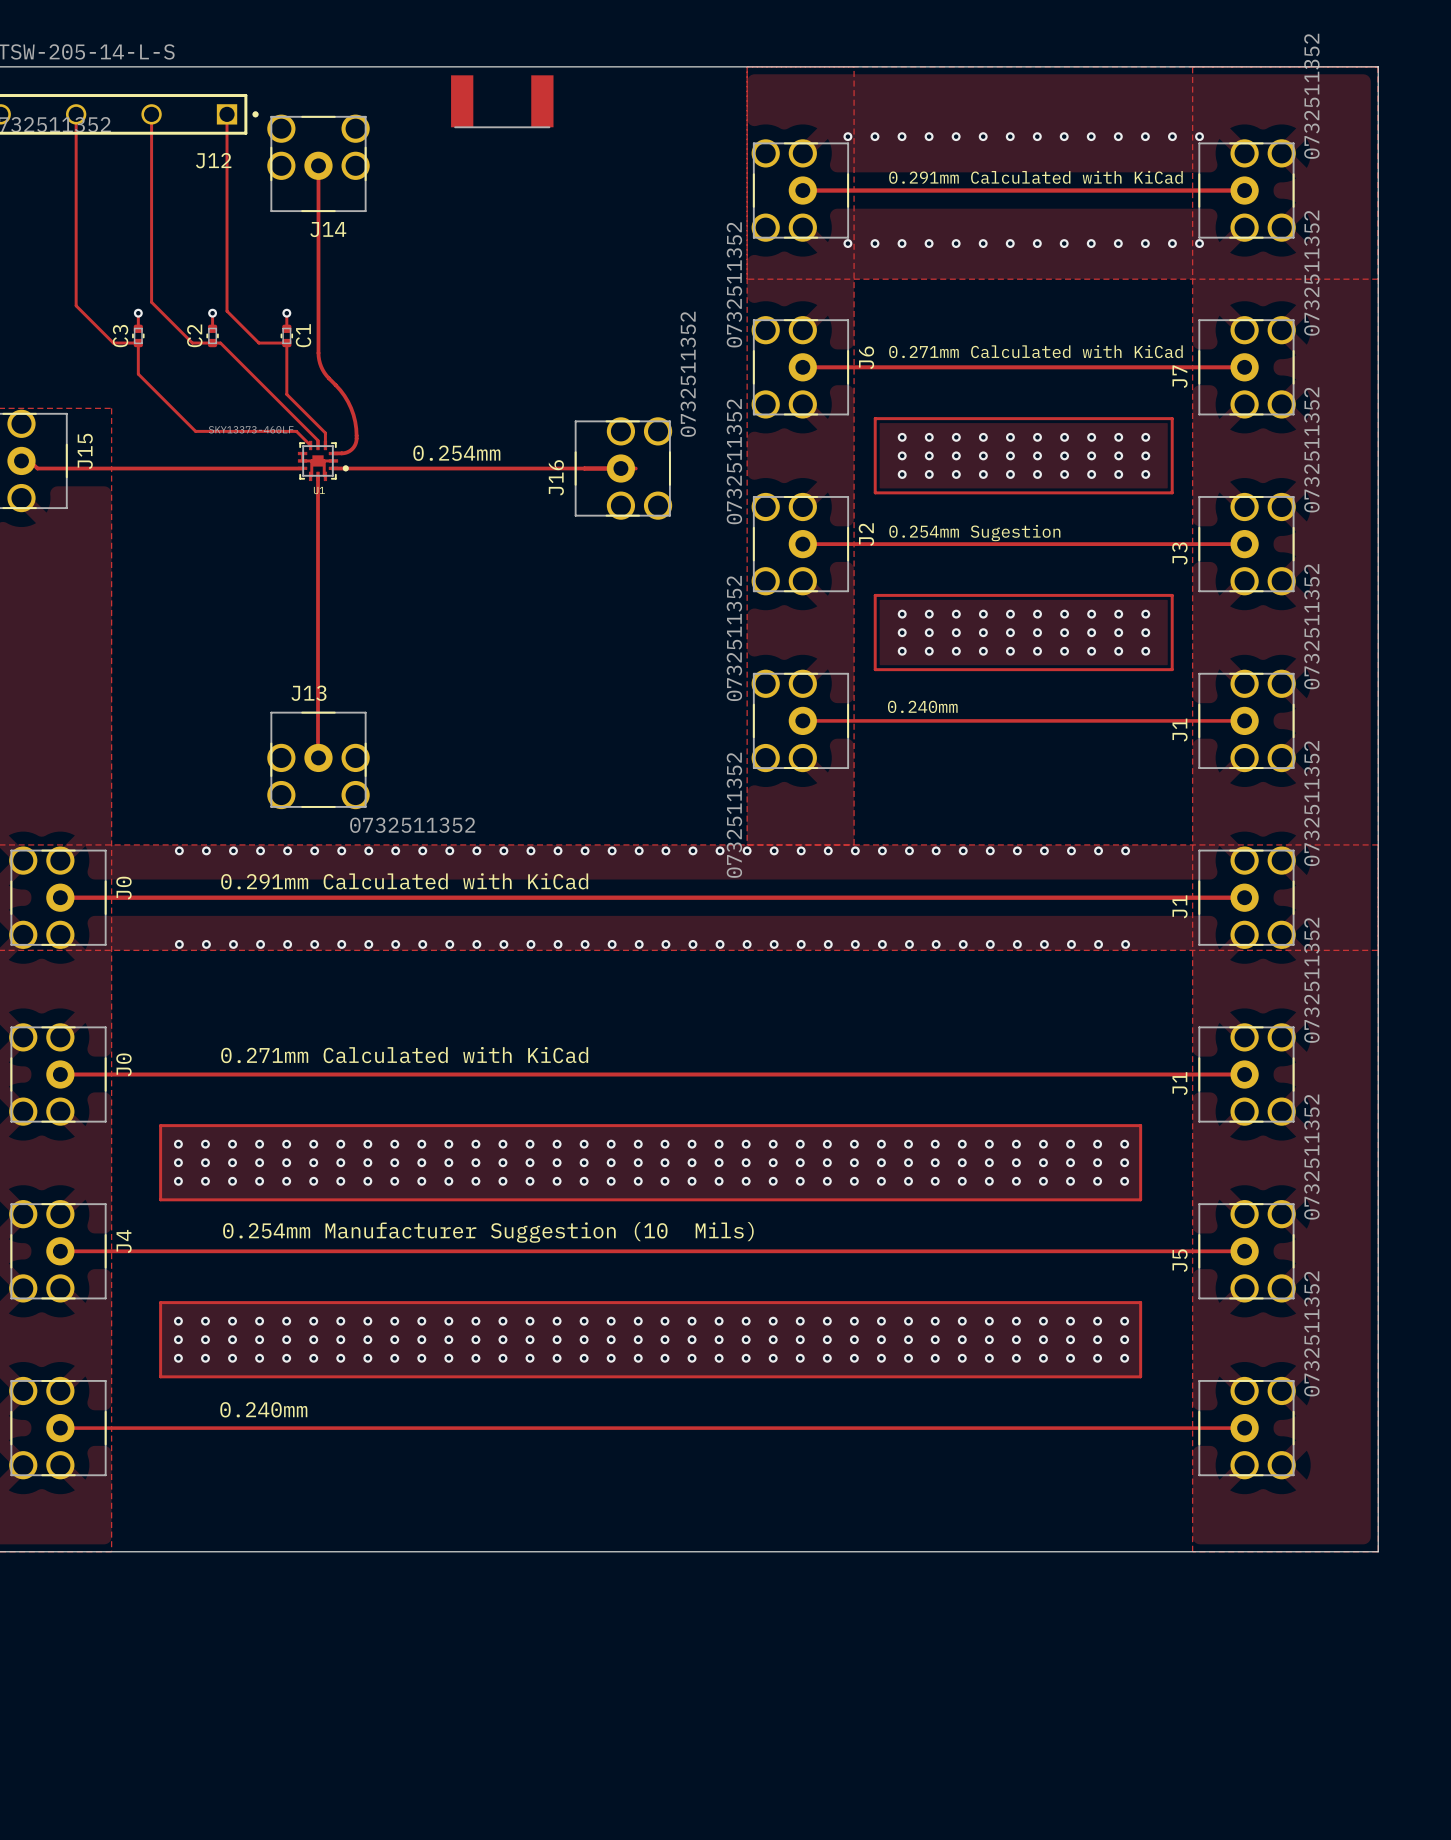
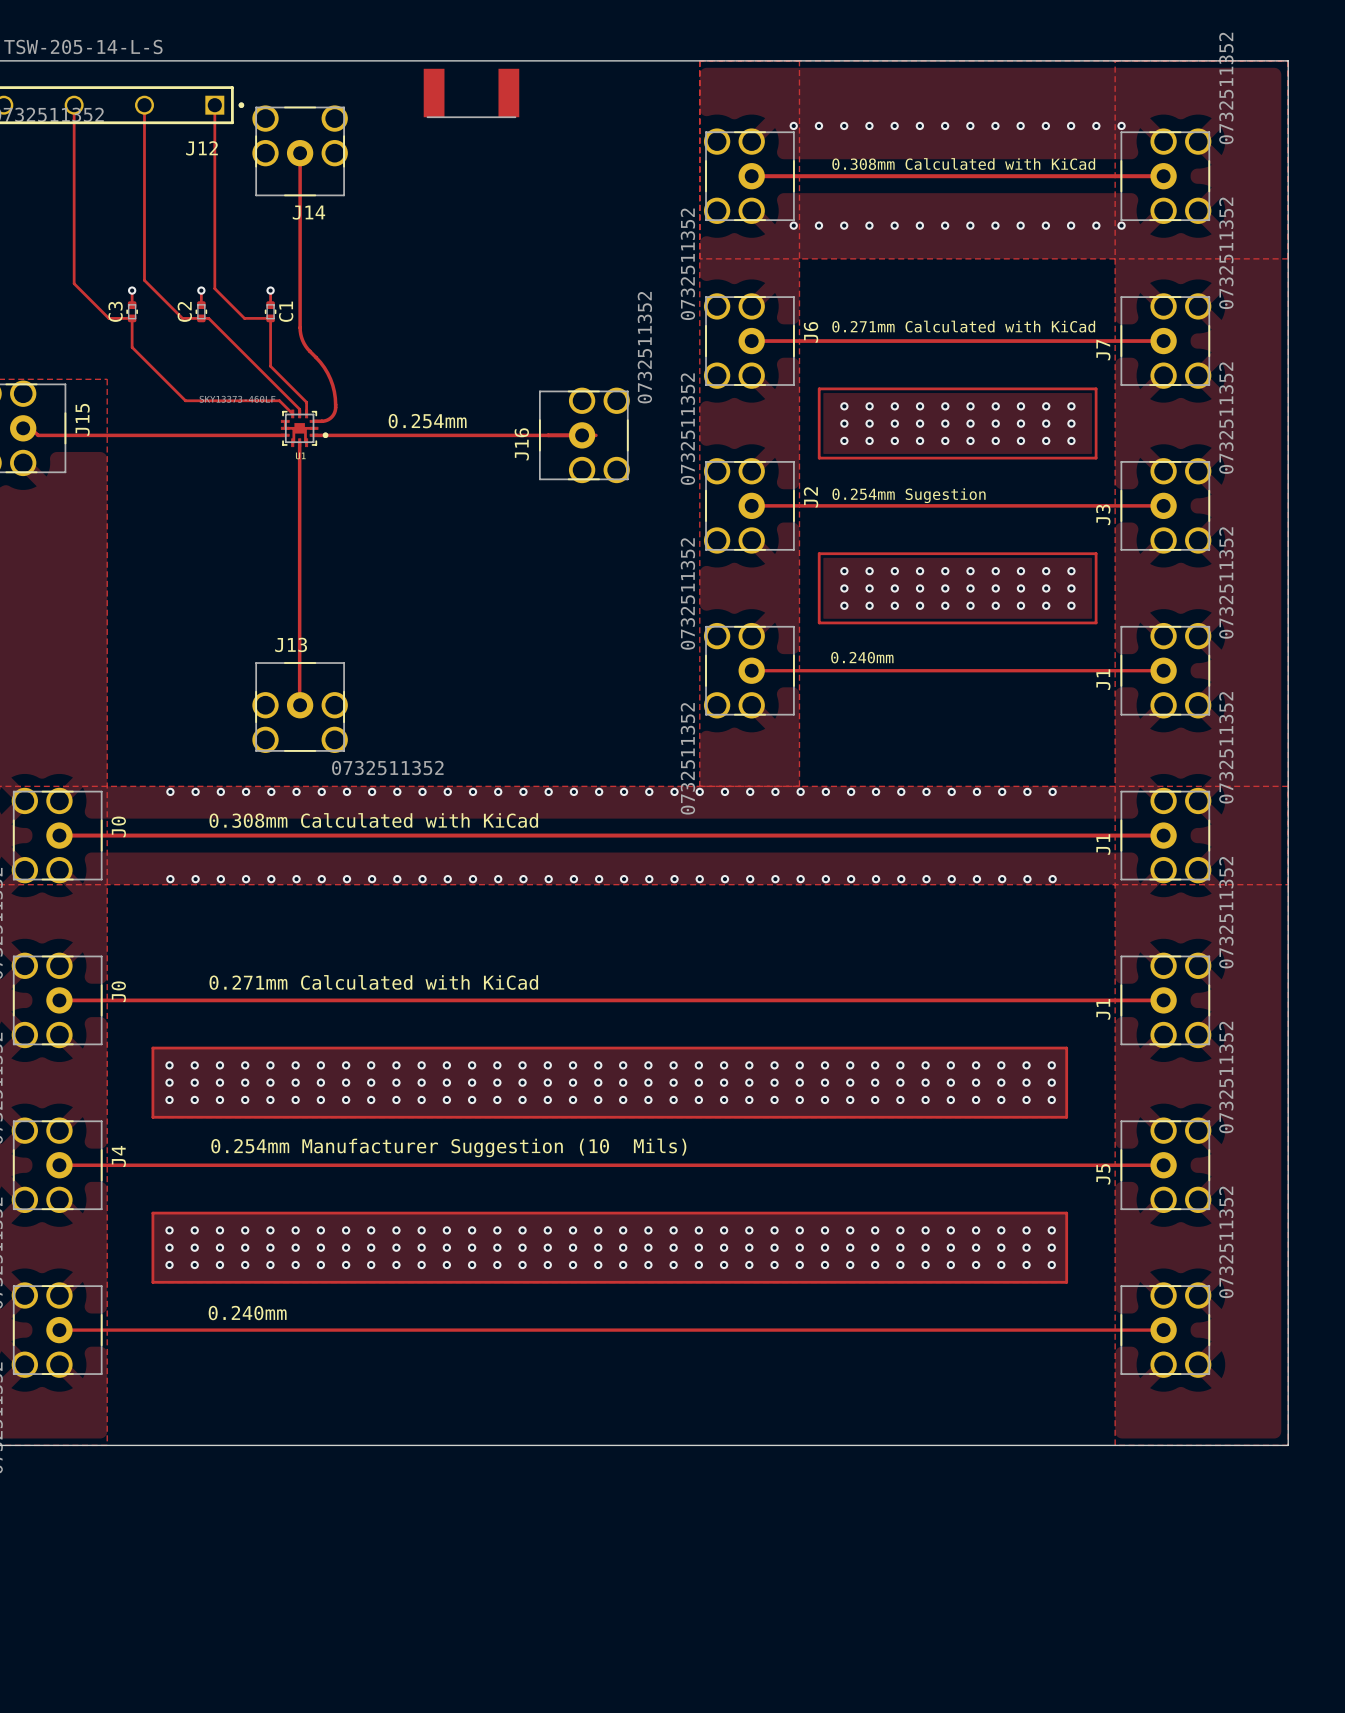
text: 0.291mm Calculated with KiCad (1035, 177) -> 0.308mm Calculated with KiCad (963, 164)
text: 0.291mm Calculated with KiCad (404, 881) -> 0.308mm Calculated with KiCad (373, 820)

